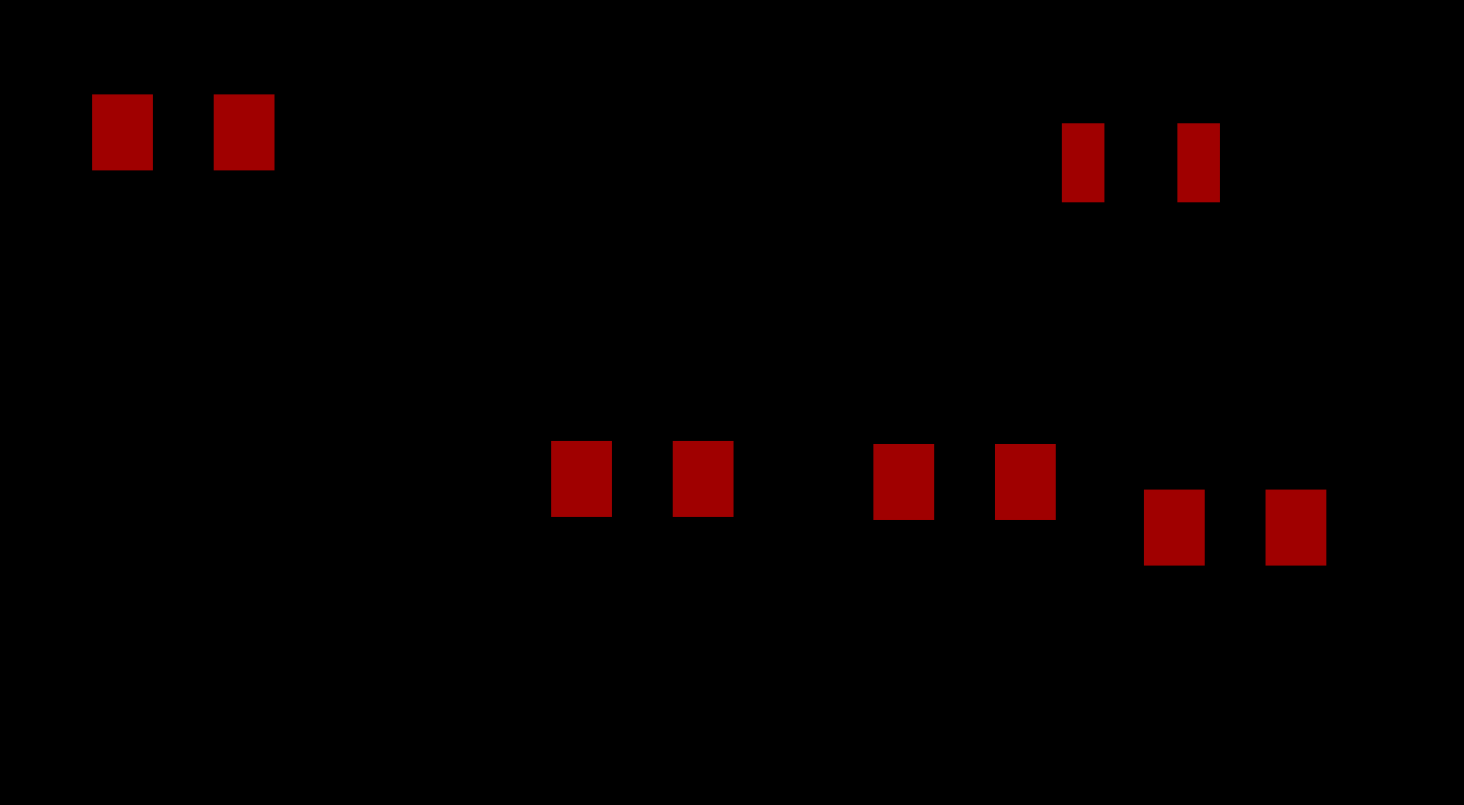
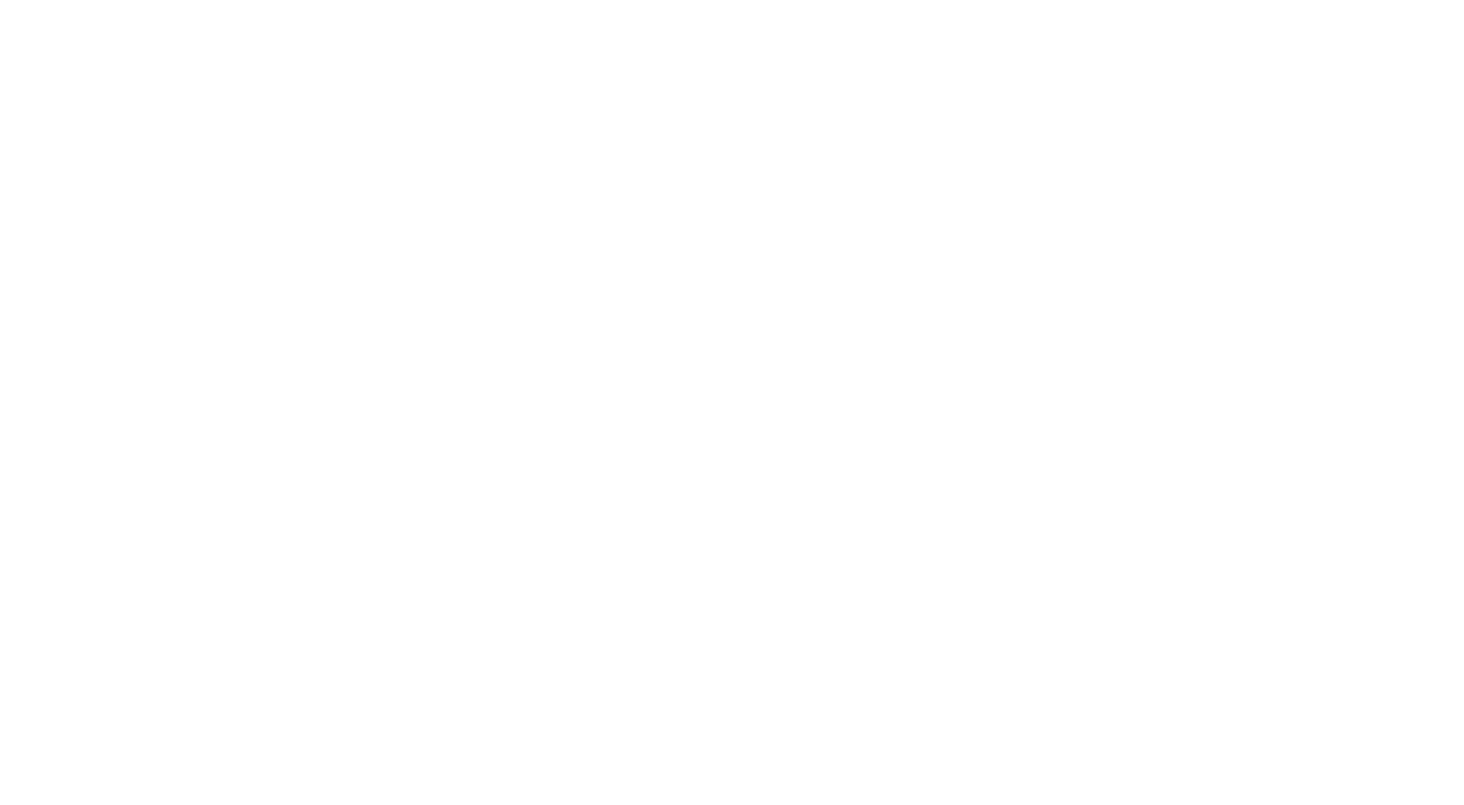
part: (183, 132) -> none
part: (1140, 162) -> none
part: (642, 478) -> none
part: (964, 481) -> none
part: (1235, 527) -> none

